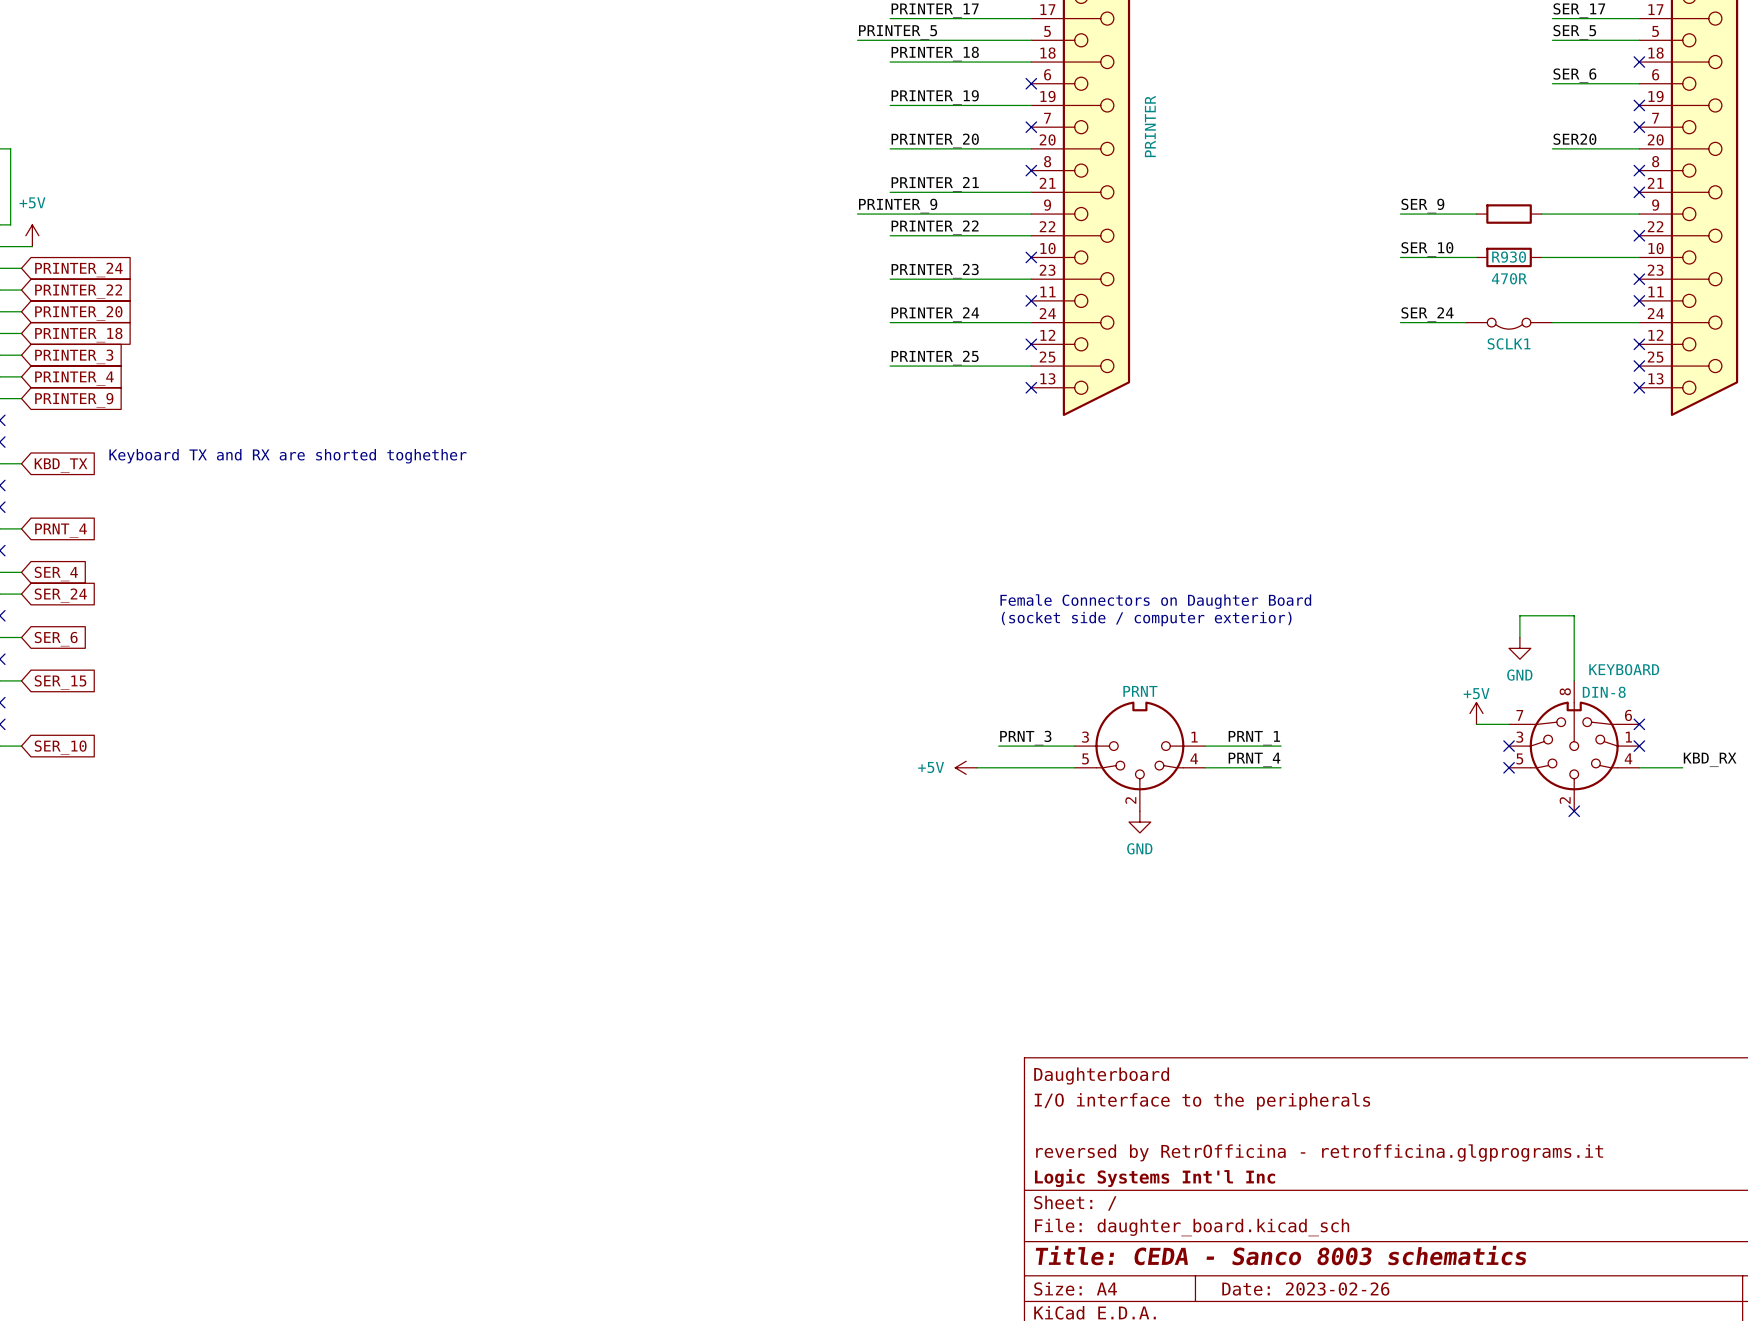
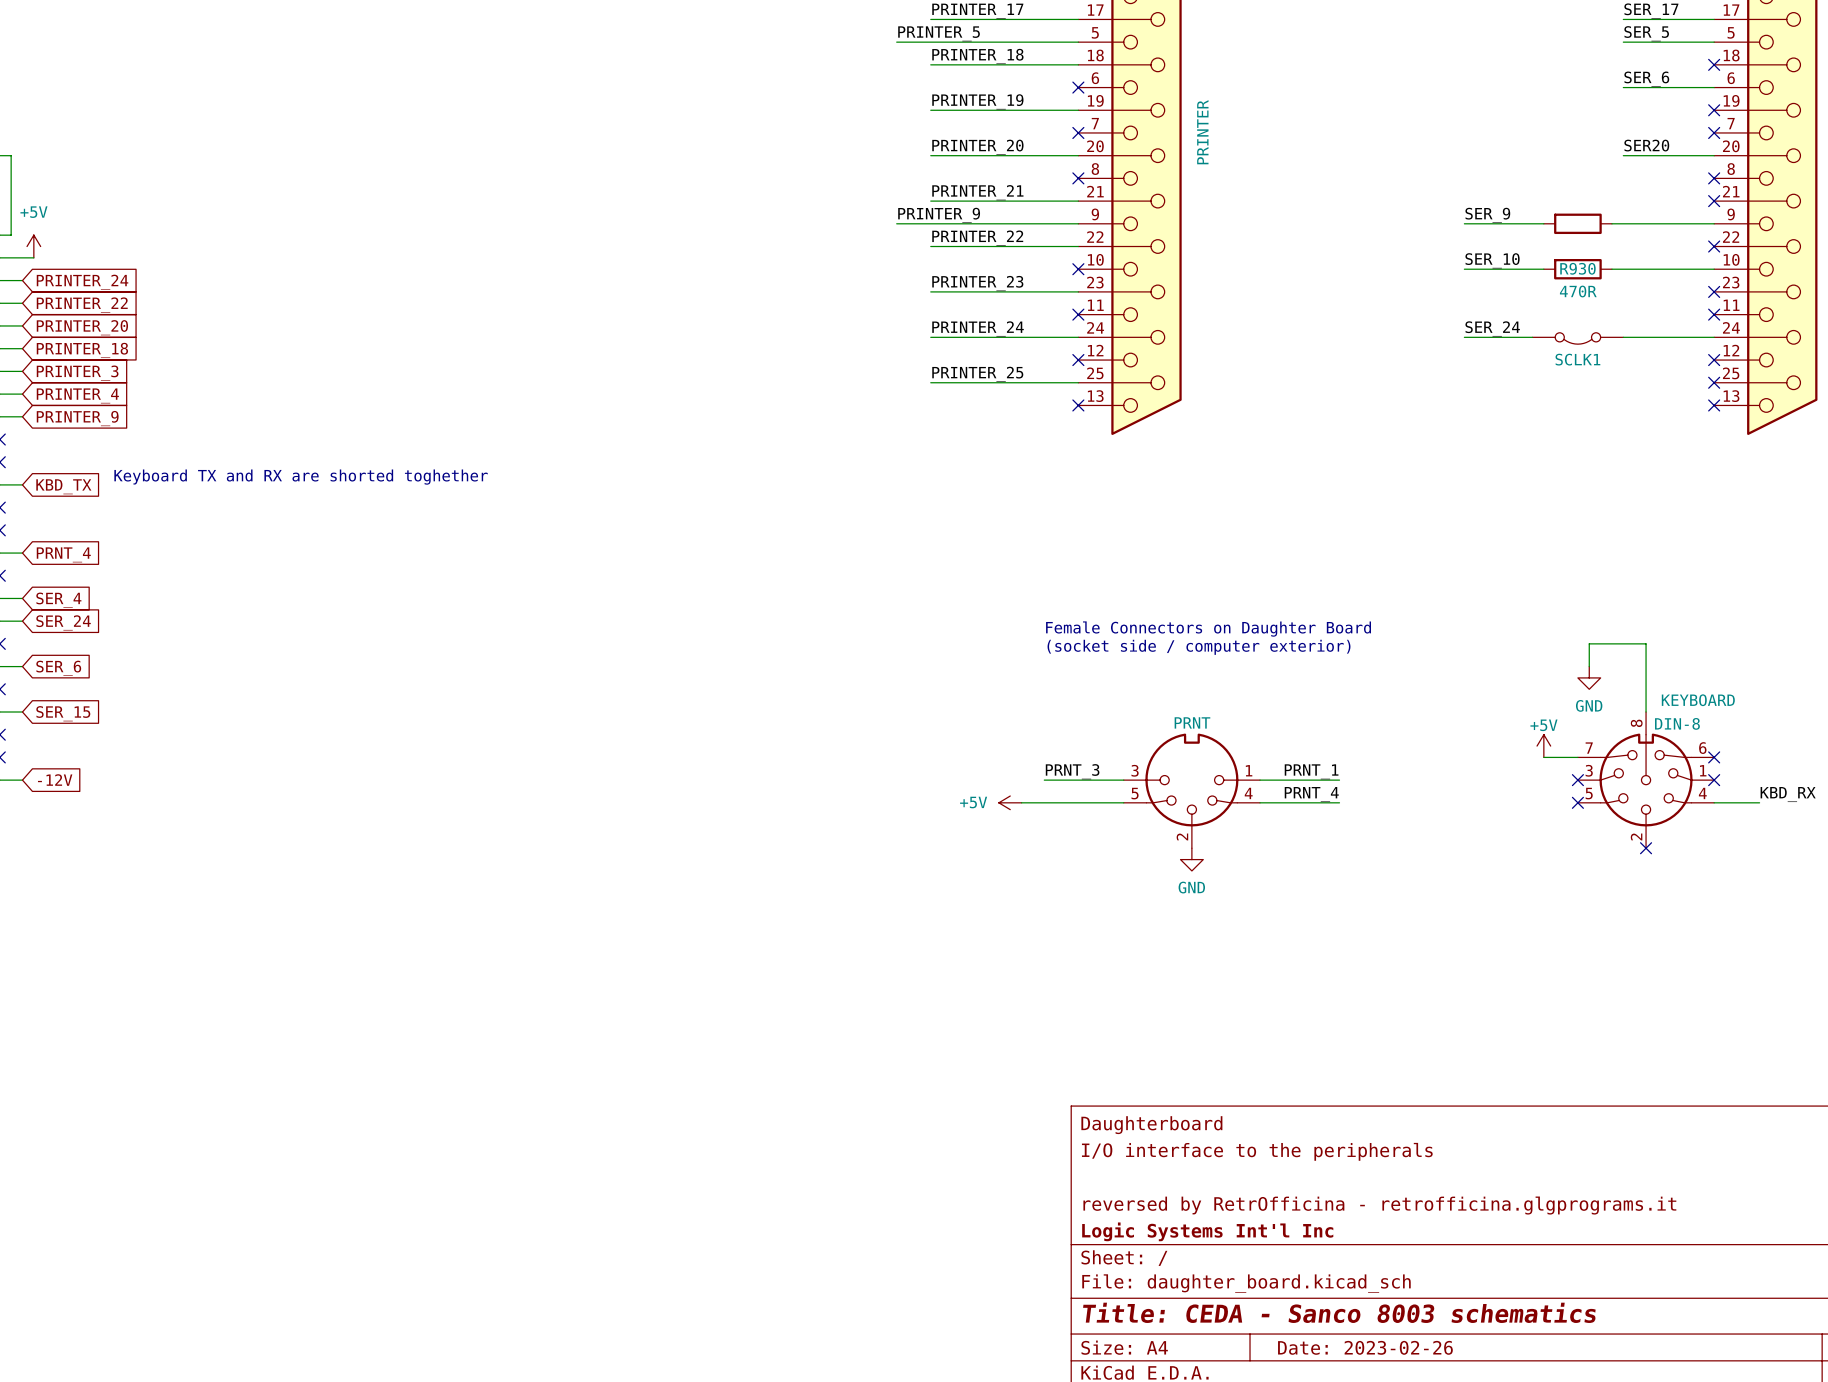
global label: SER_10 (60, 747) -> -12V (55, 780)

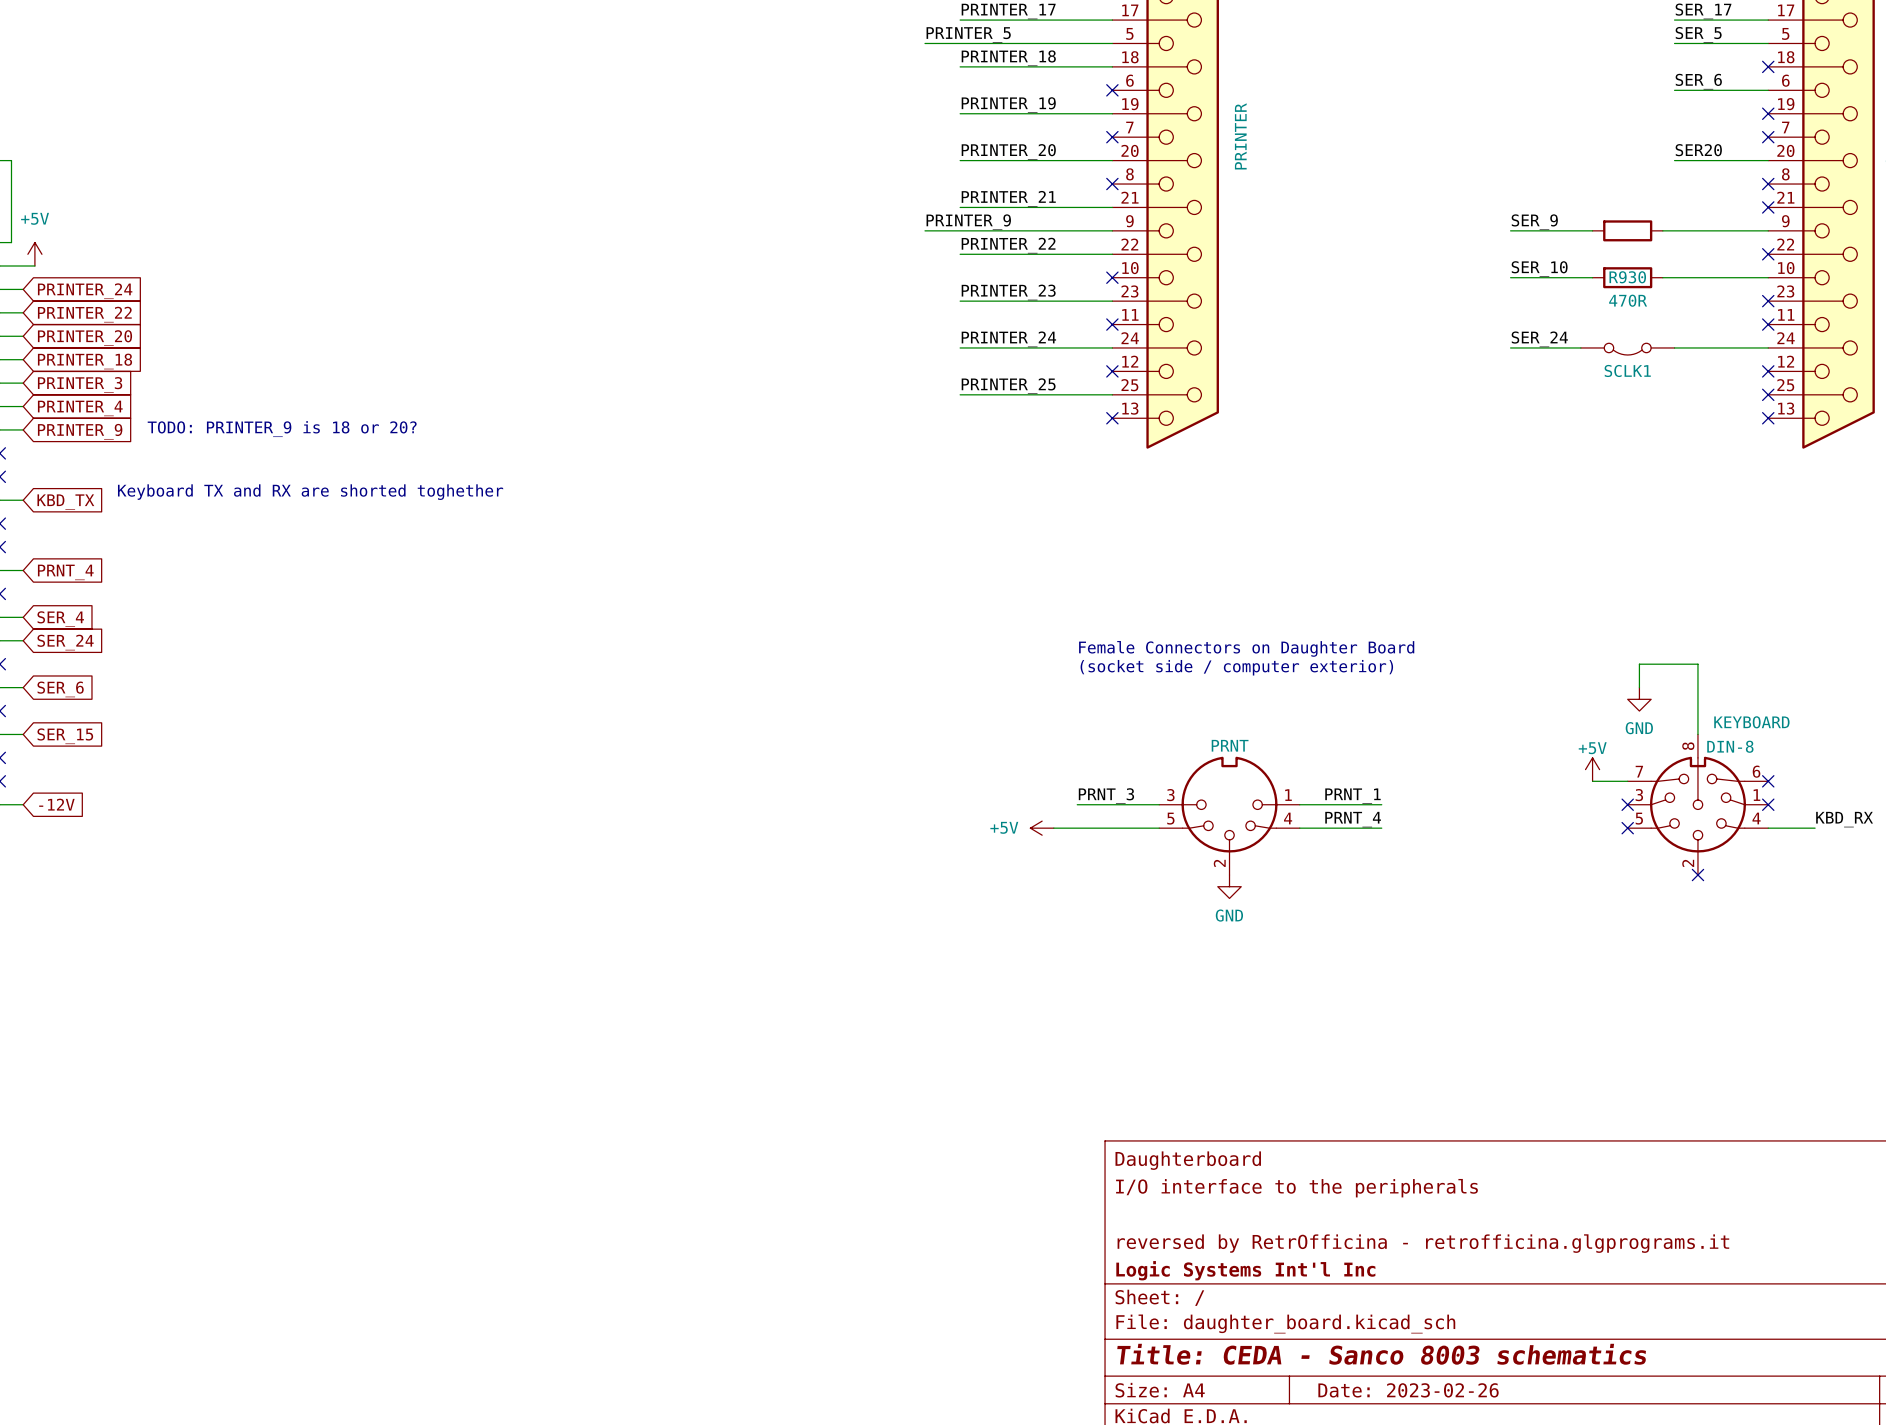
text: none -> TODO: PRINTER_9 is 18 or 20? (282, 429)

